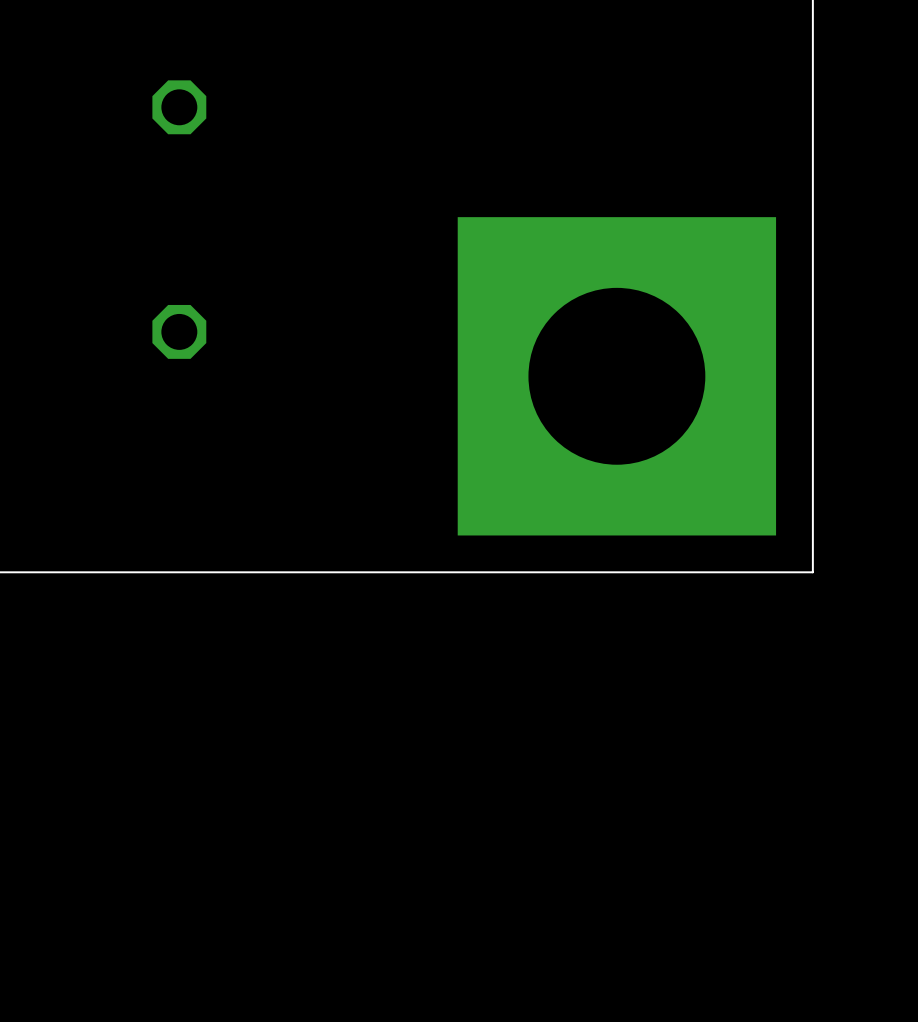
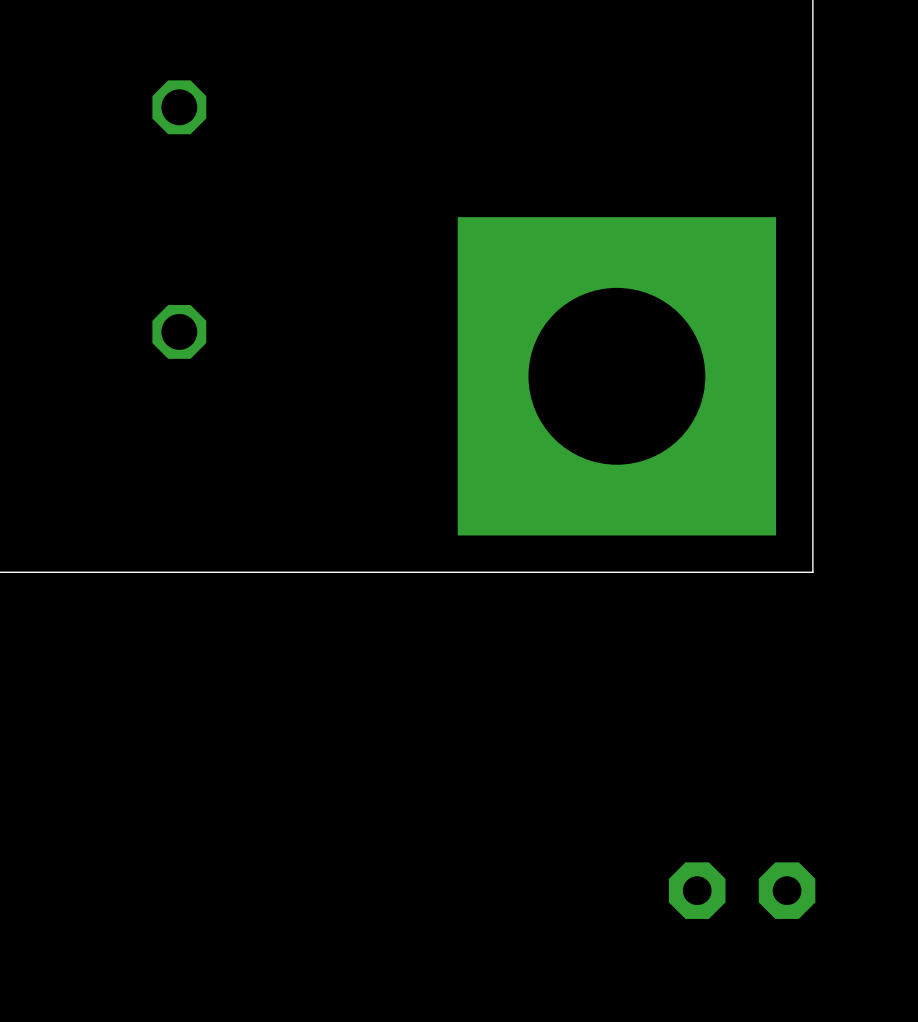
part: none -> (742, 890)

